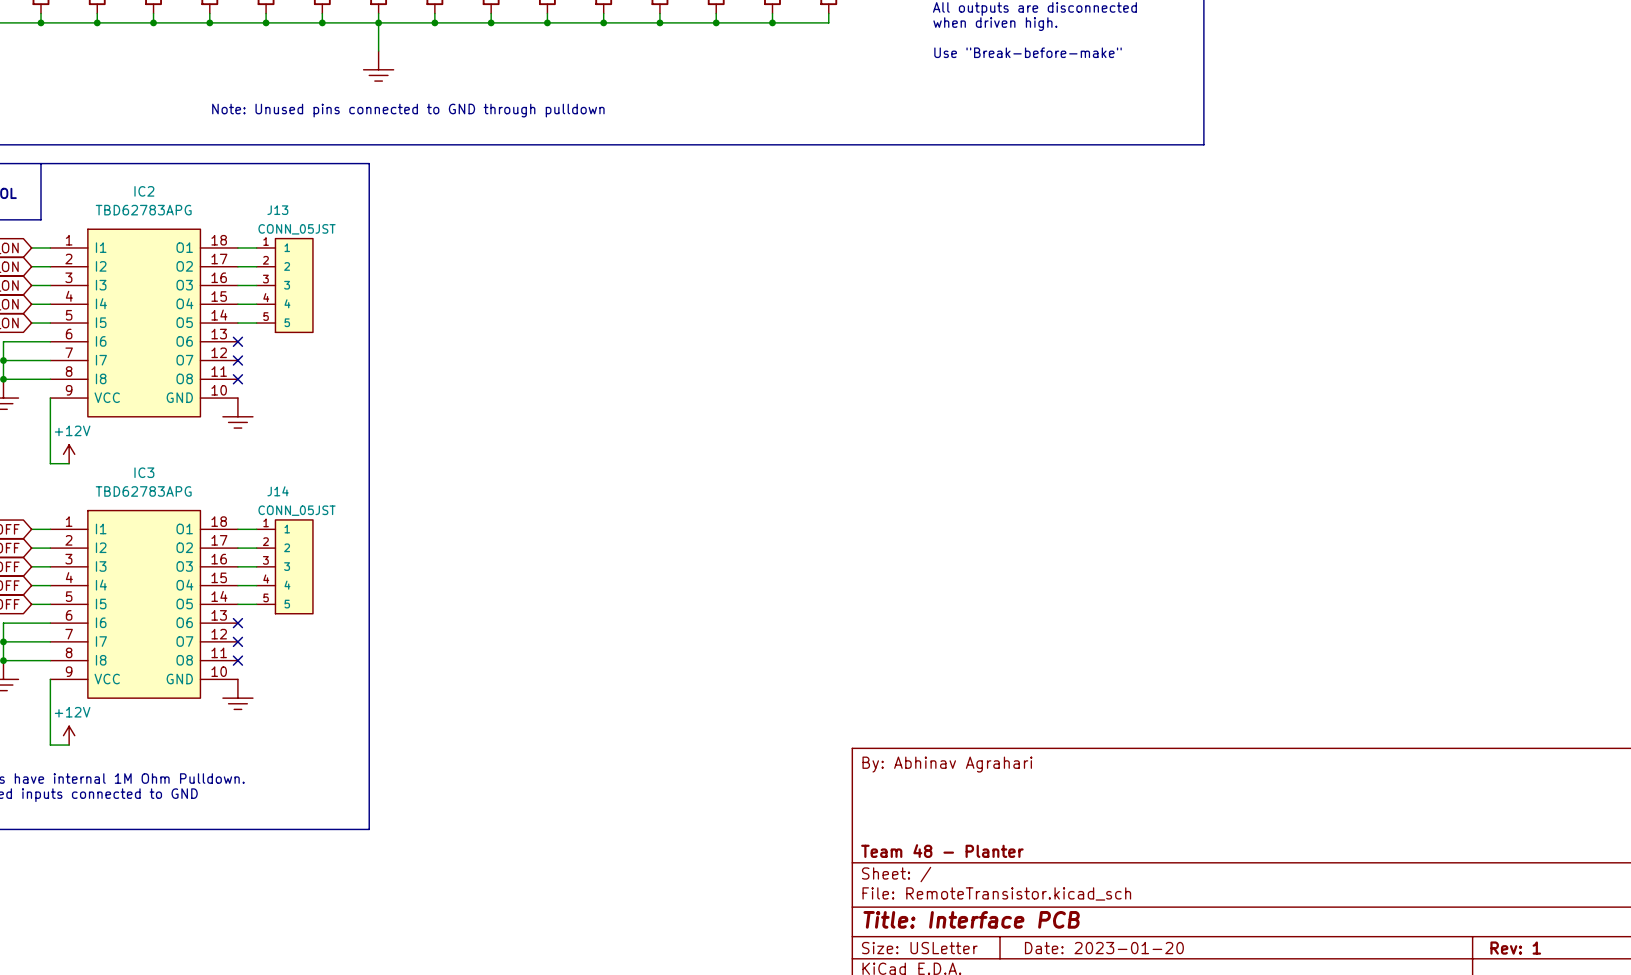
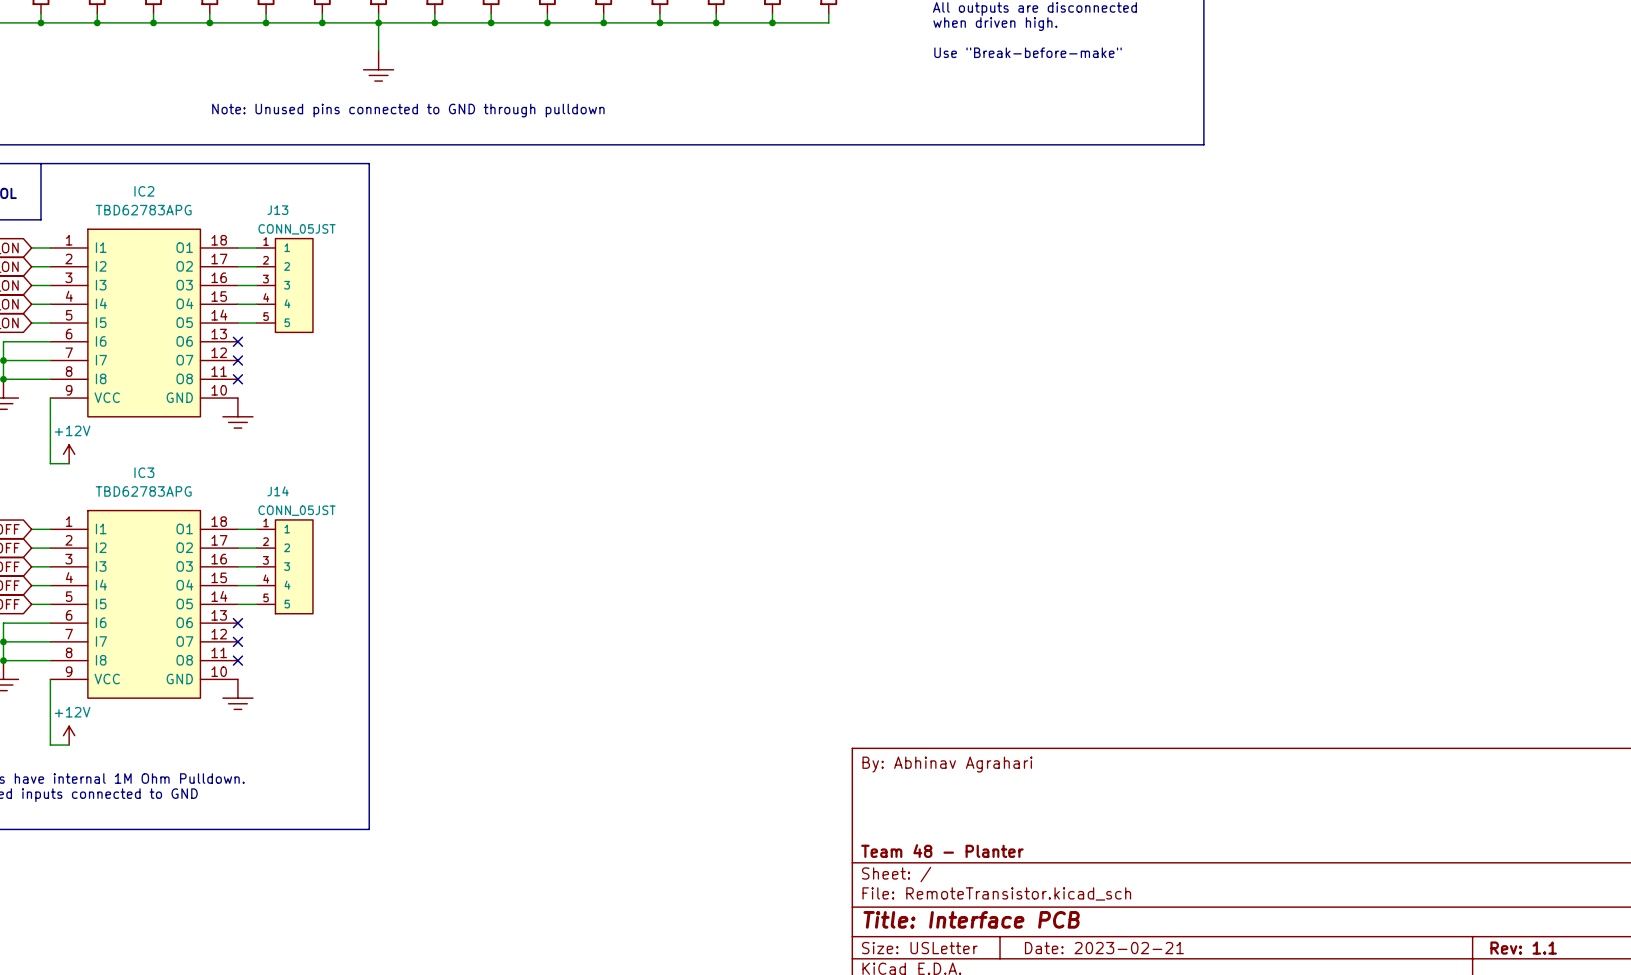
title block: Date: 2023-01-20 (1104, 948) -> Date: 2023-02-21 (1104, 948)
title block: Rev: 1 (1515, 948) -> Rev: 1.1 (1523, 948)

